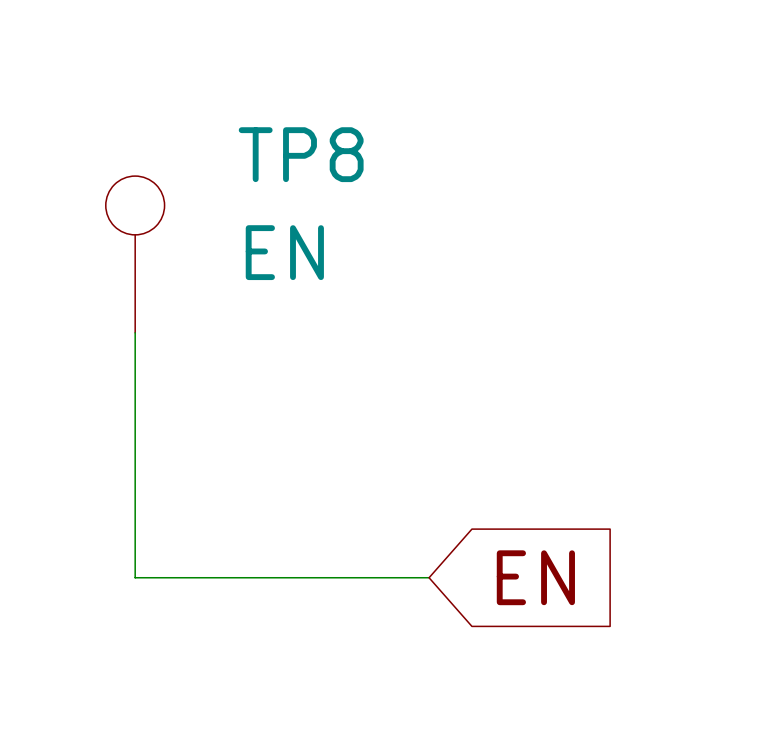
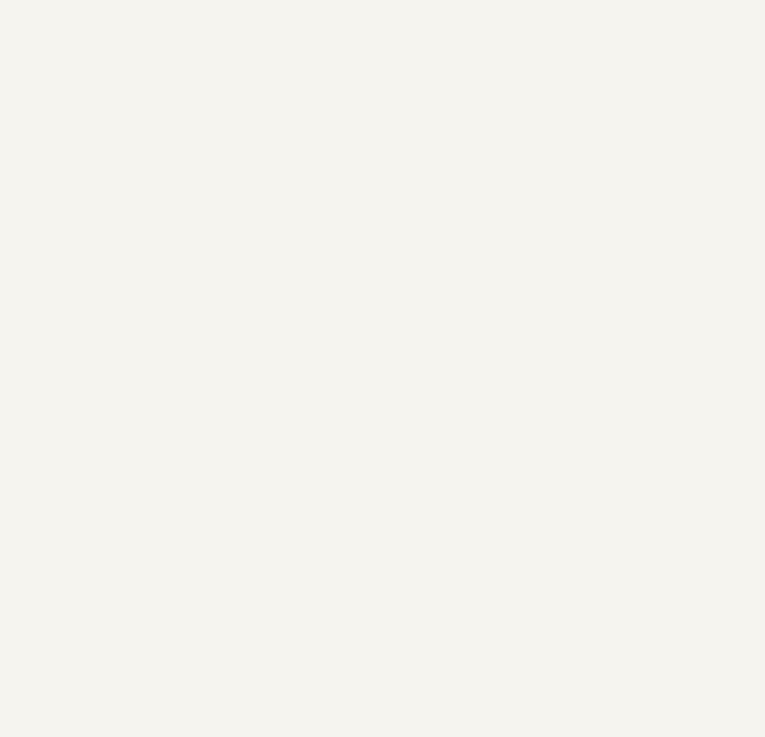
TP8: EN (135, 254) -> none
wire: (135, 332) (135, 577) (429, 577) -> none
global label: EN (535, 577) -> none

